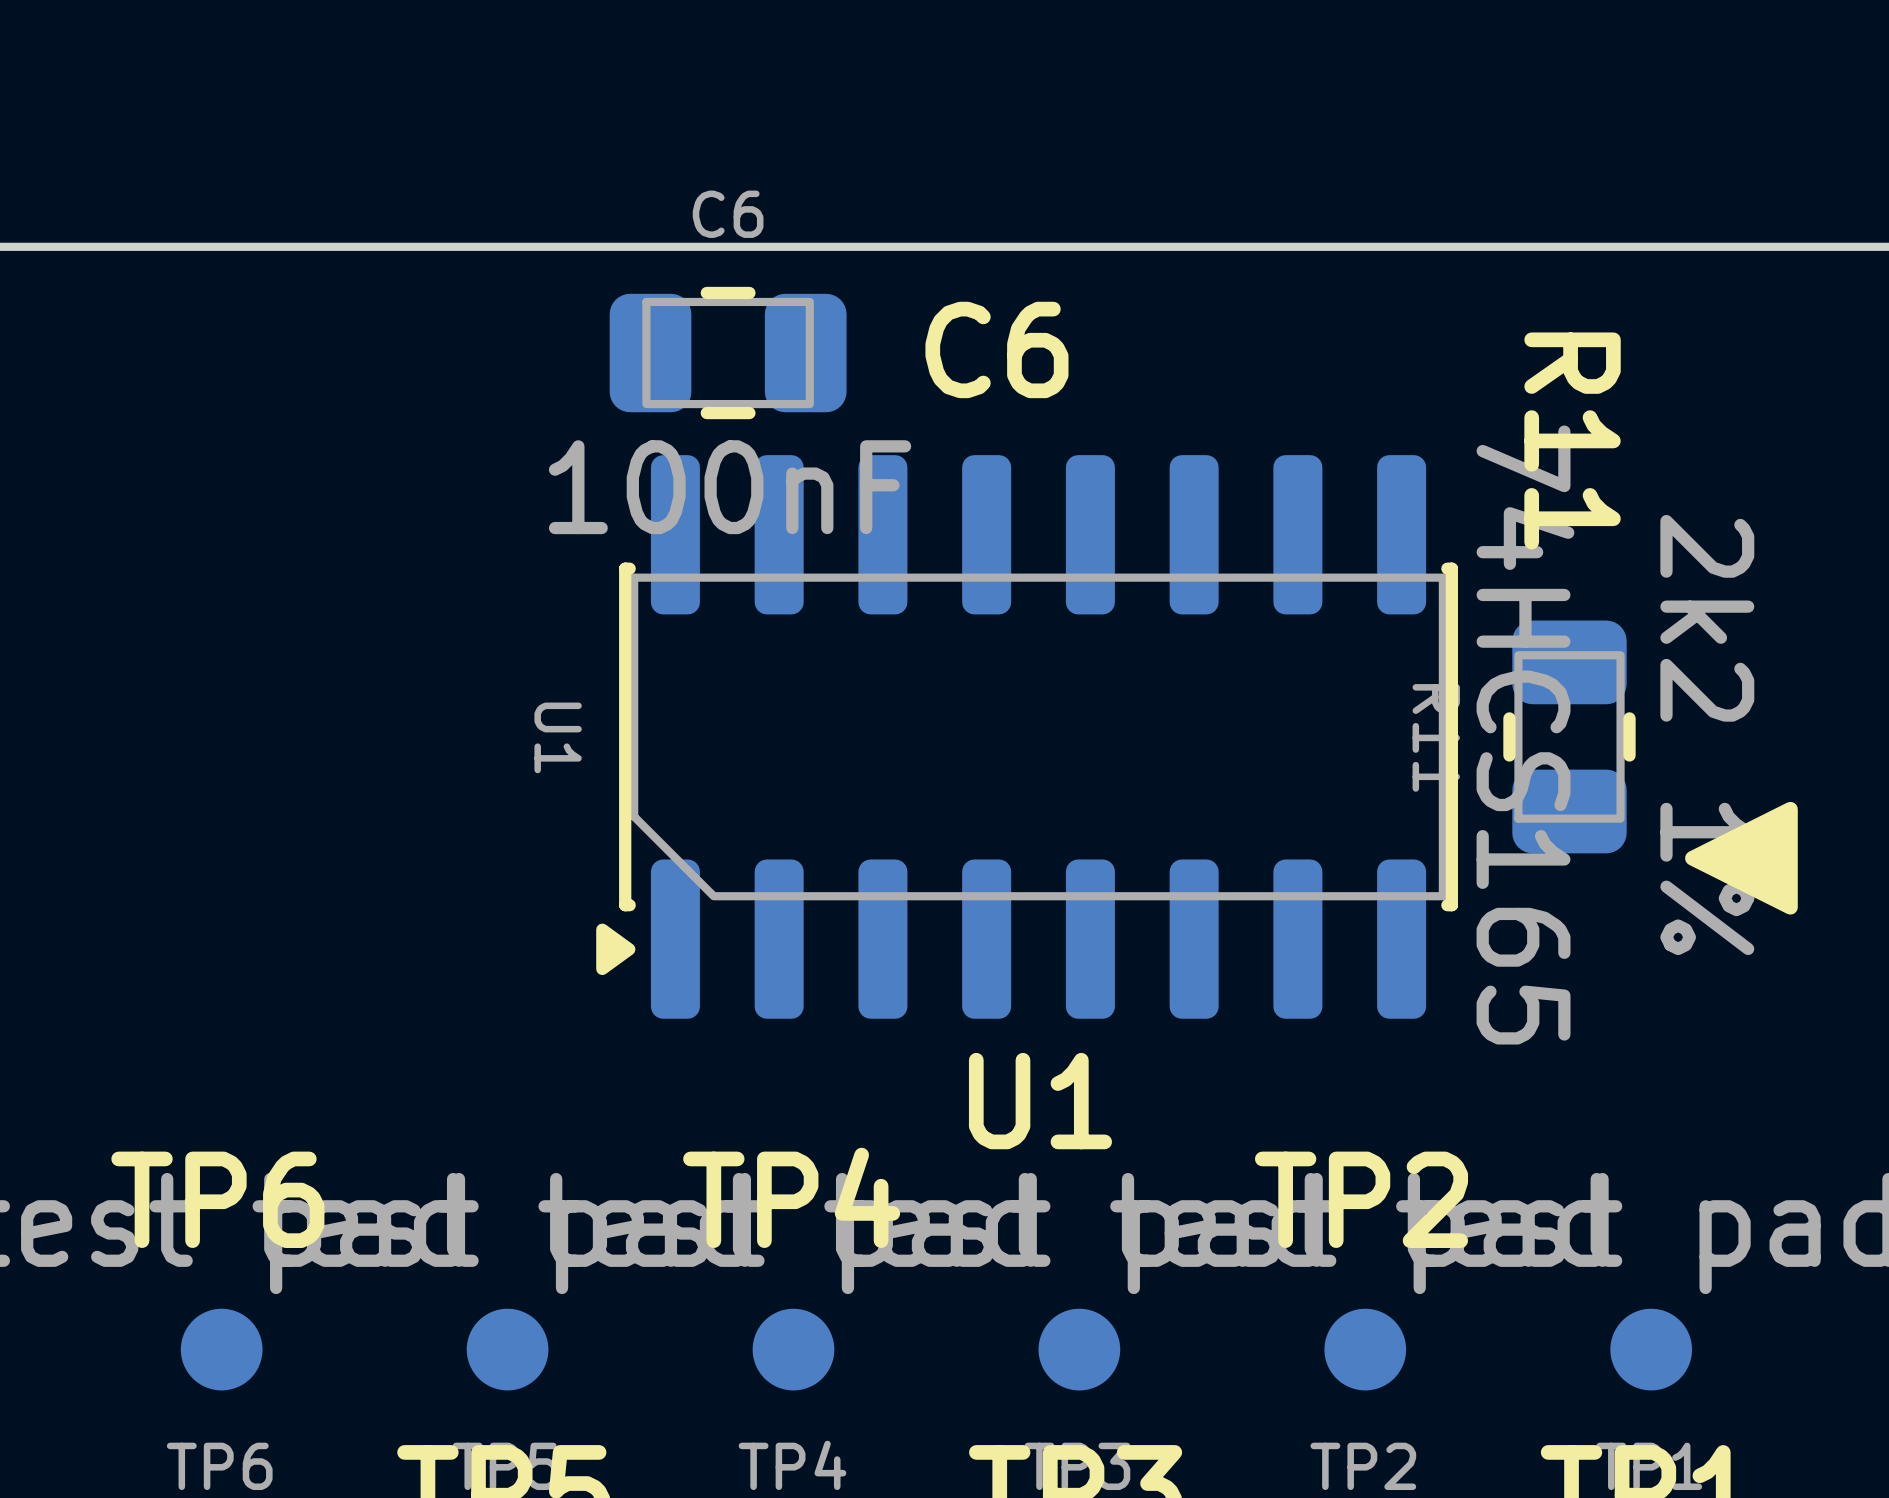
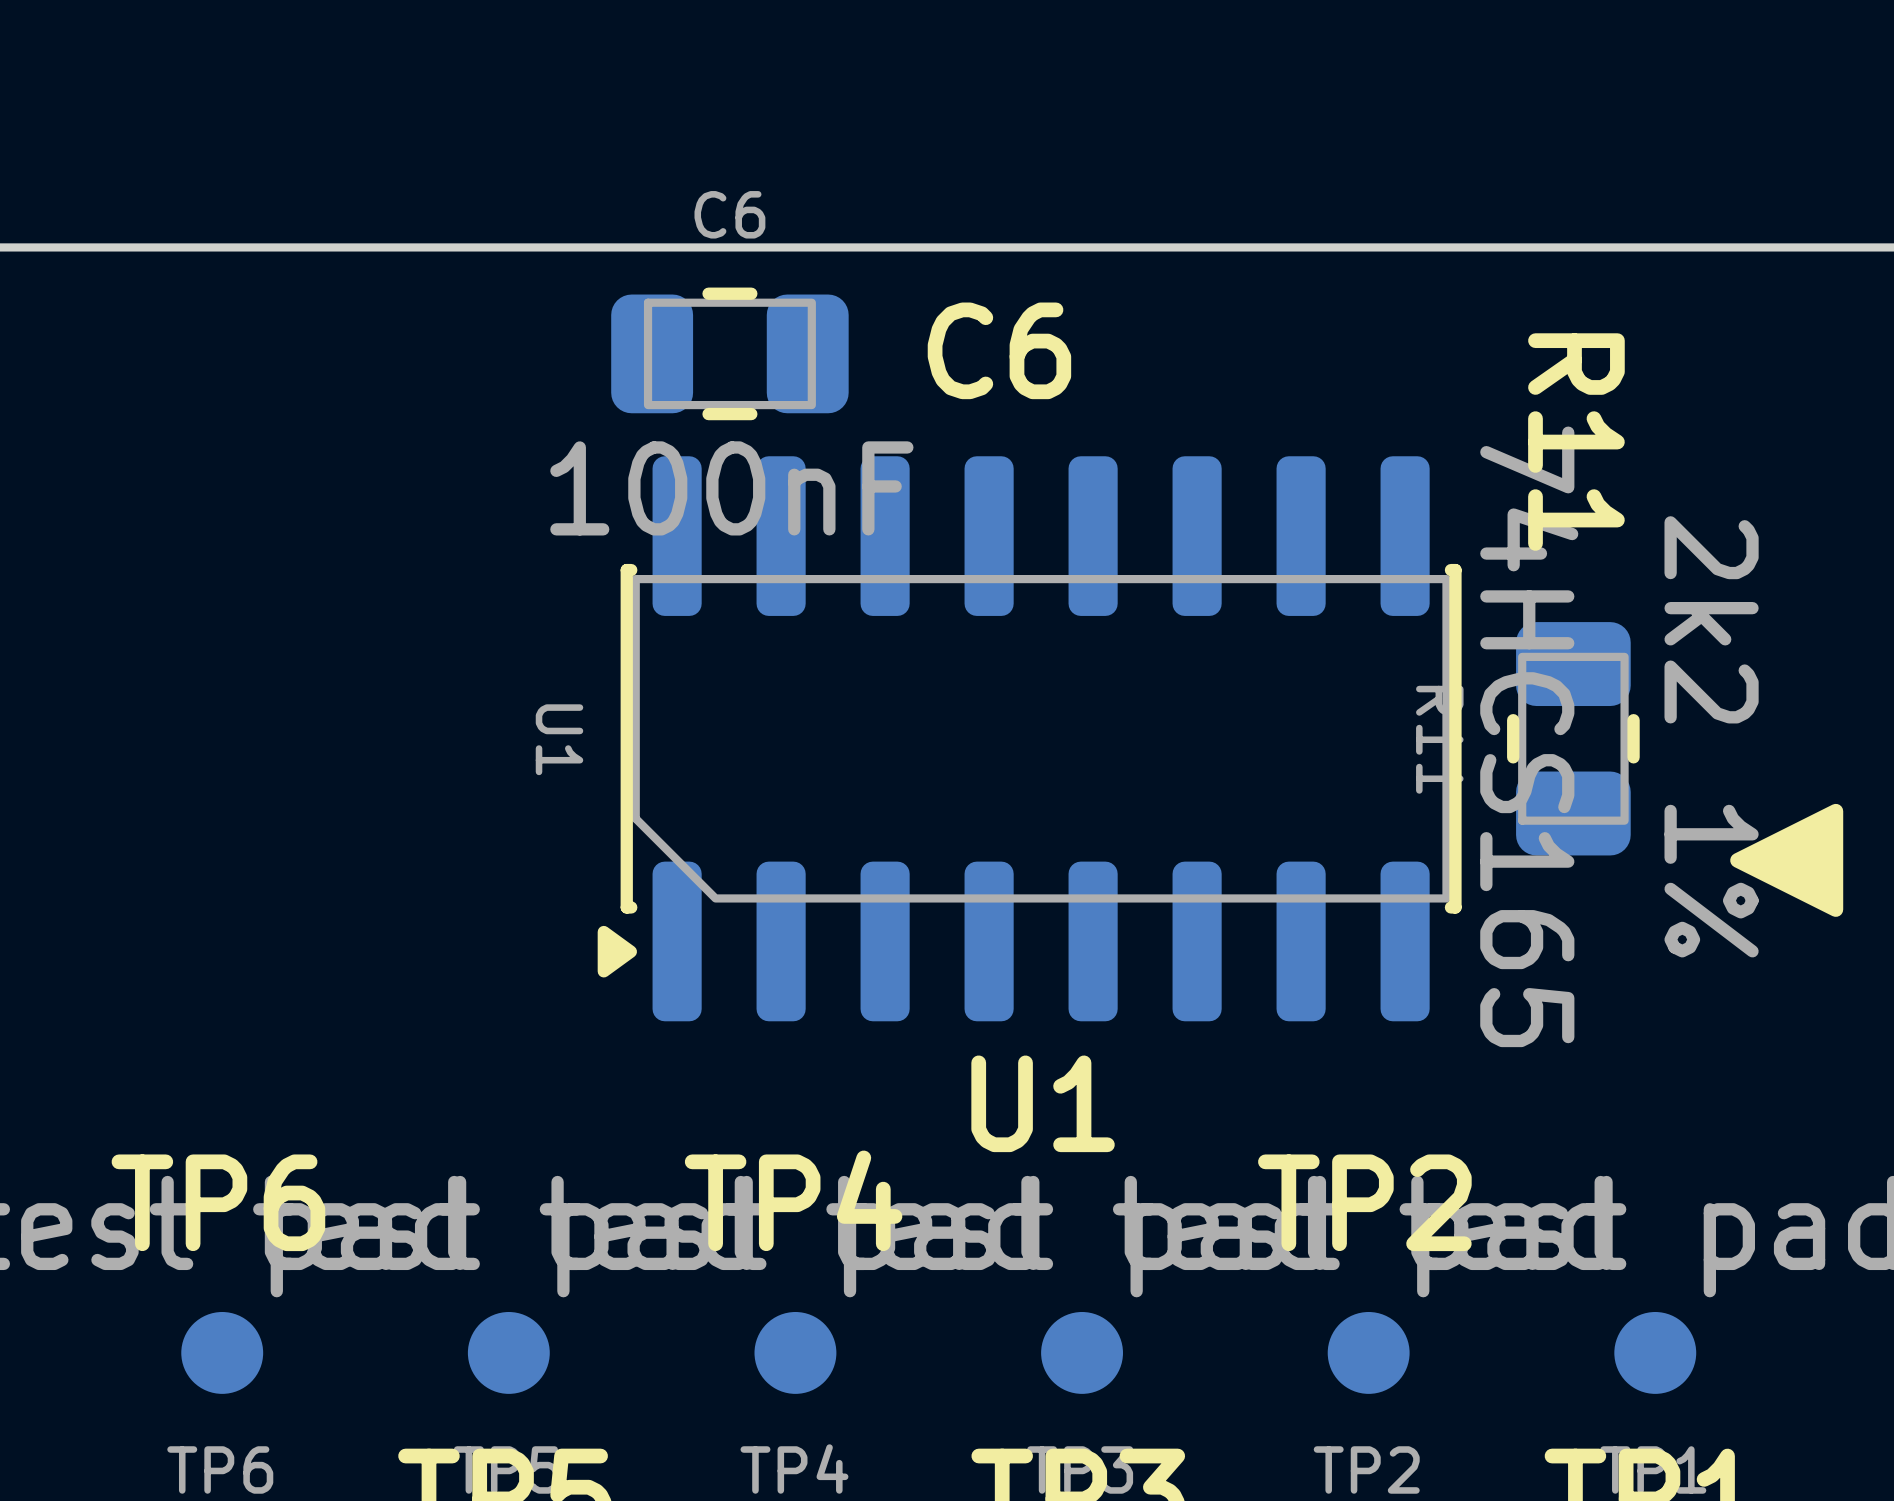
drawing position: (1741, 858) -> (1786, 860)

